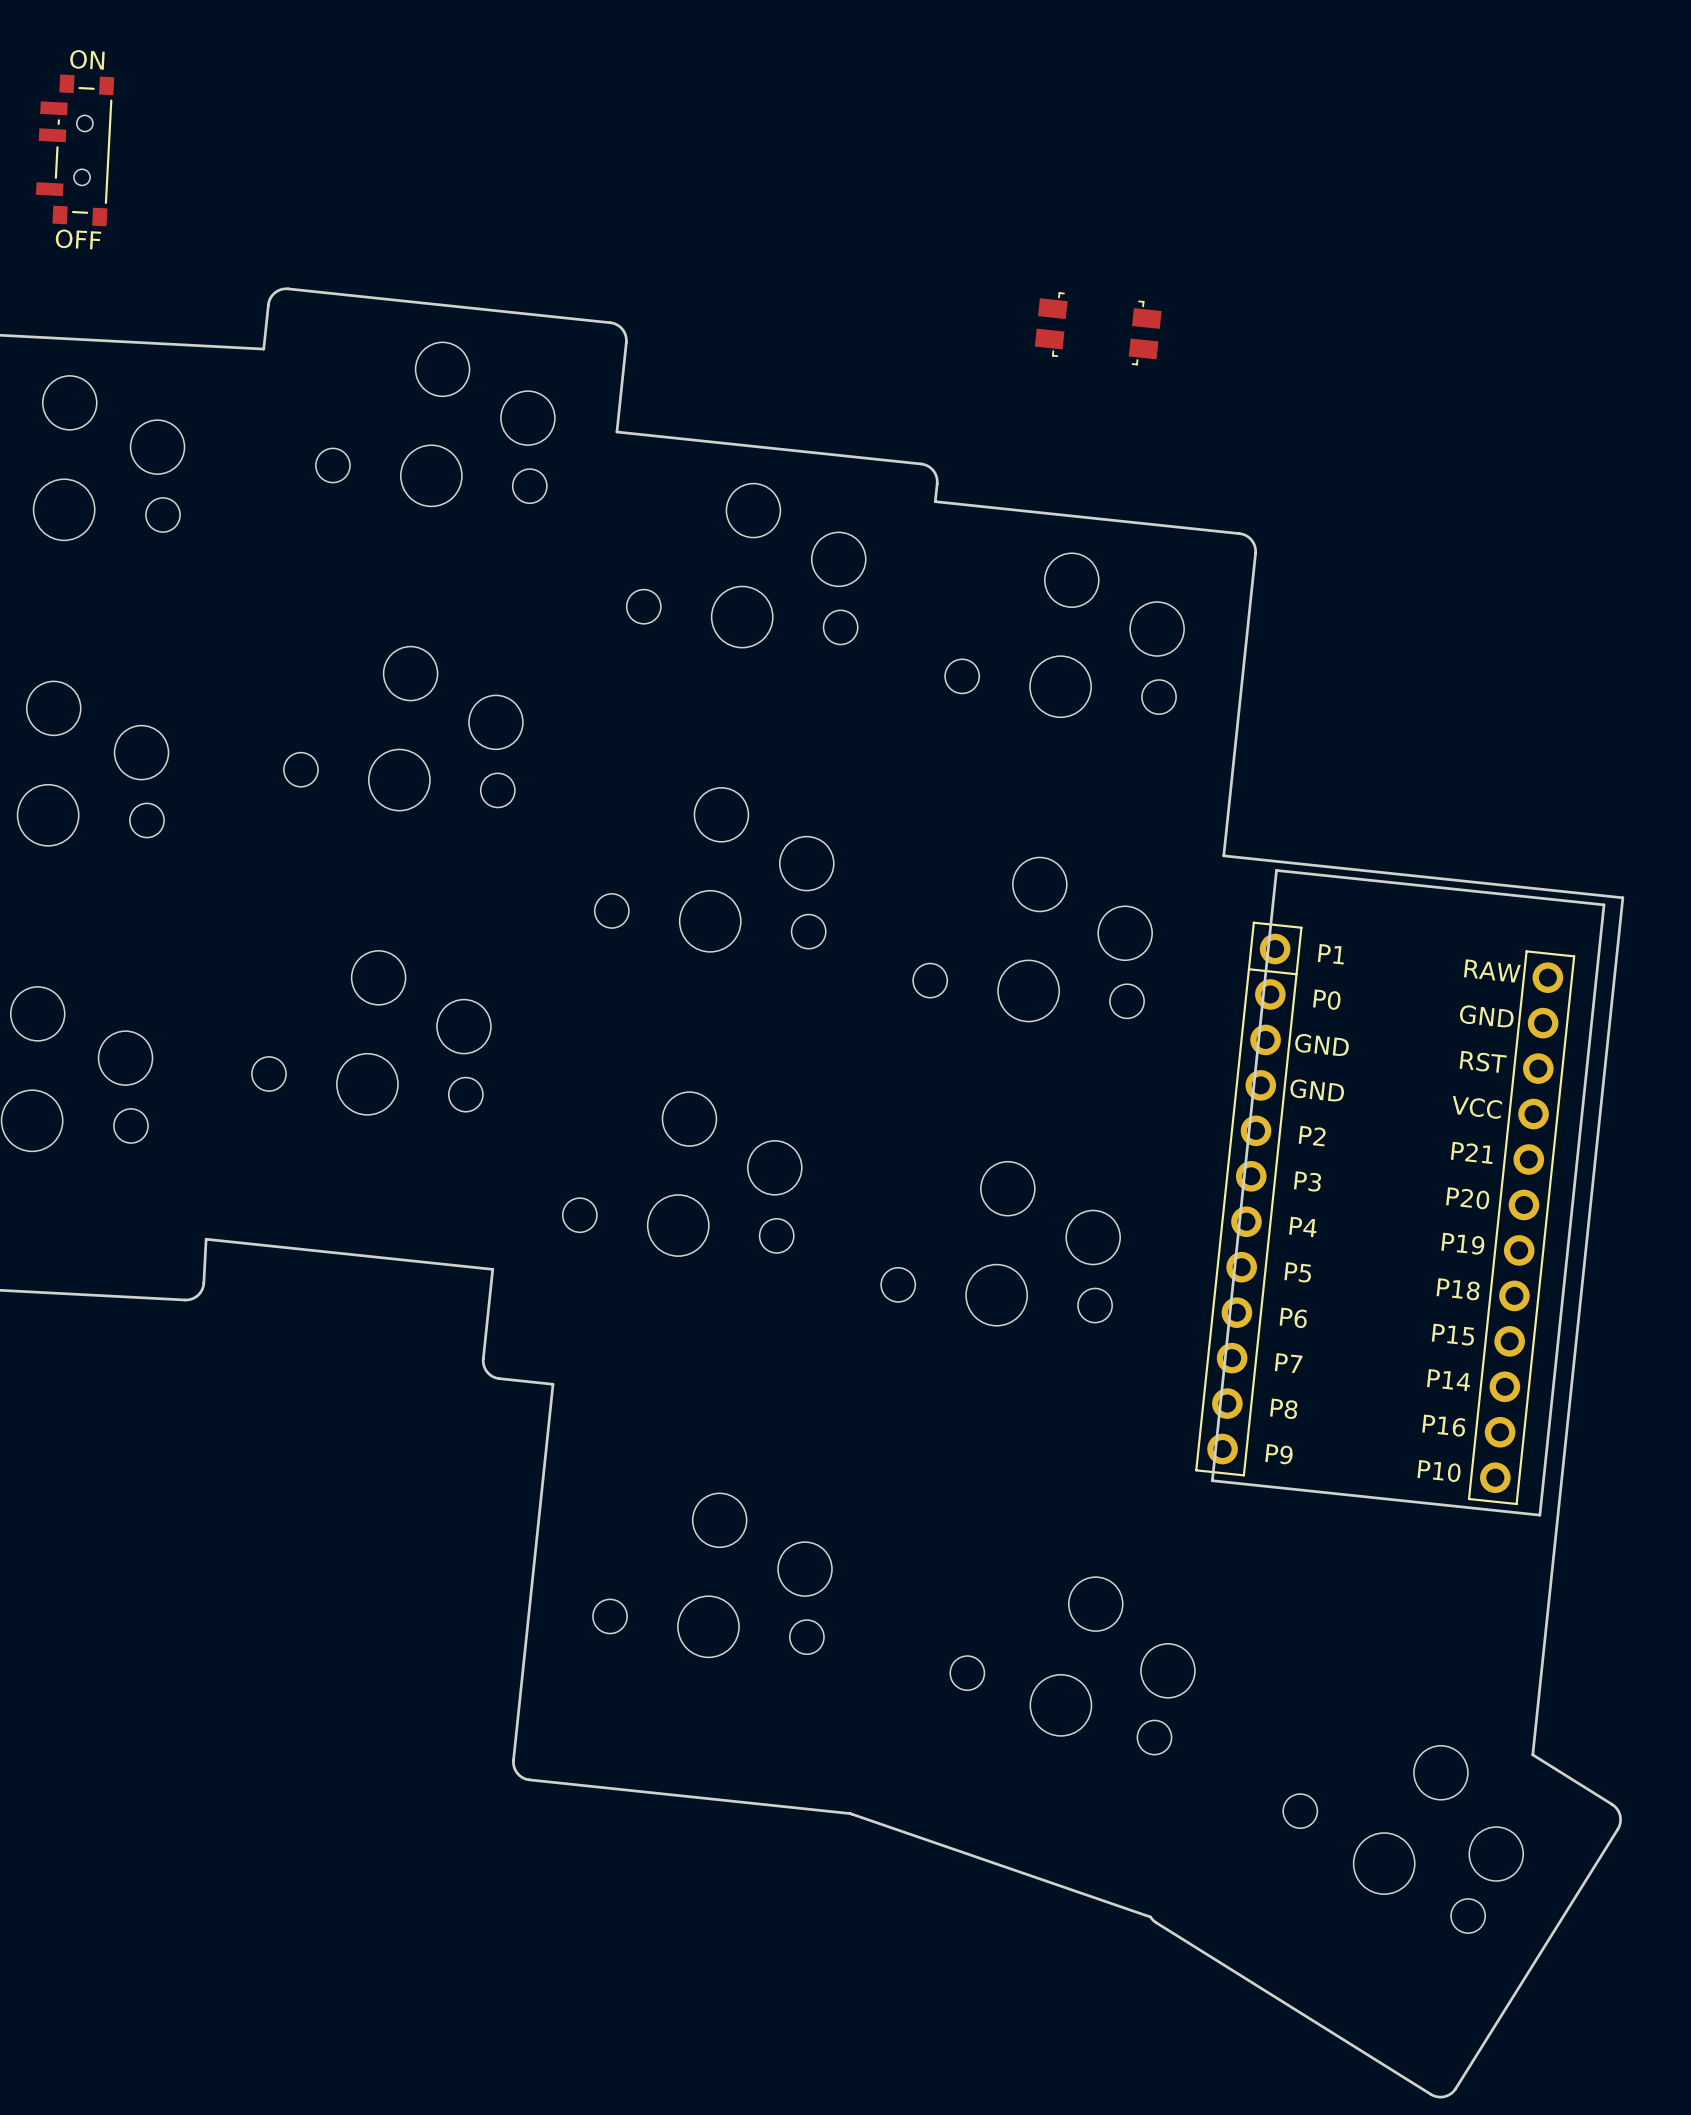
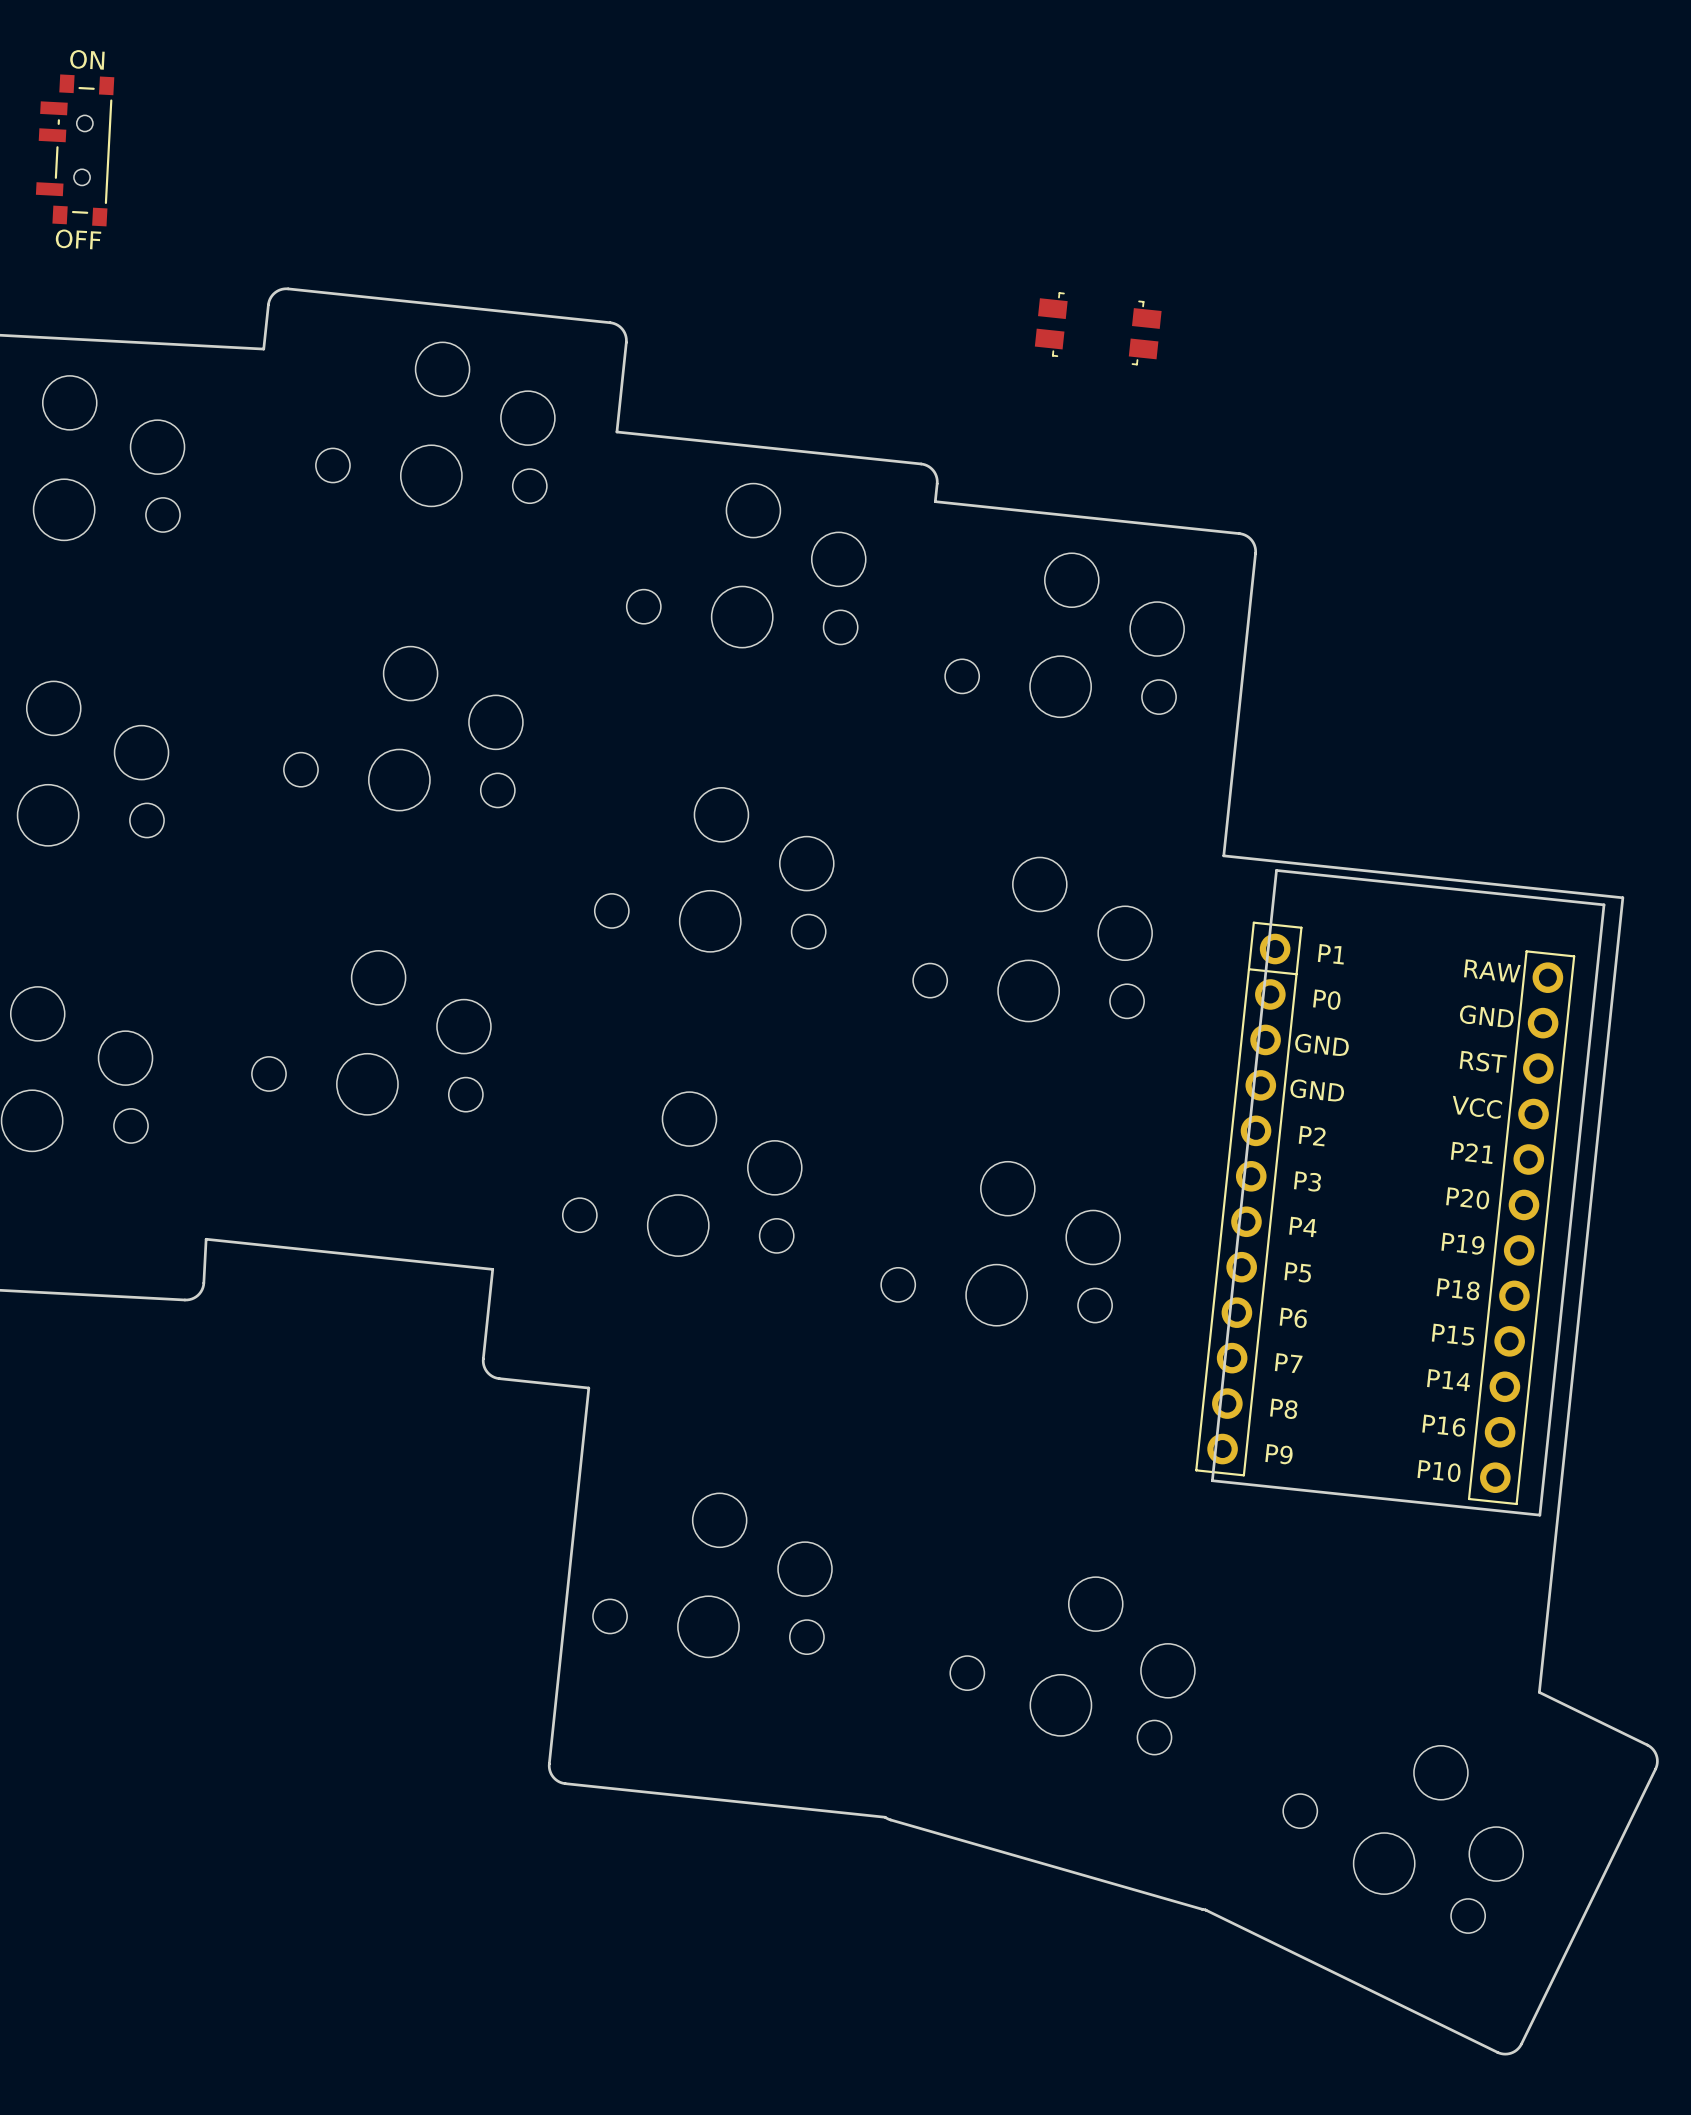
board edge: (553, 1384) (513, 1762) (516, 1771) (523, 1778) (565, 1783) -> (553, 1384) (588, 1388) (549, 1763) (553, 1777) (565, 1783)
board edge: (1539, 1692) (1532, 1754) (1614, 1805) (1619, 1813) (1620, 1822) (1455, 2088) (1444, 2096) (1430, 2094) (1156, 1922) (1150, 1917) (850, 1813) -> (1655, 1769) (1521, 2044) (1516, 2050) (1507, 2054) (1497, 2052) (1205, 1909) (885, 1817) (850, 1813)
board edge: none -> (1539, 1692) (1647, 1745)
board edge: none -> (1647, 1745) (1656, 1755) (1655, 1769)

